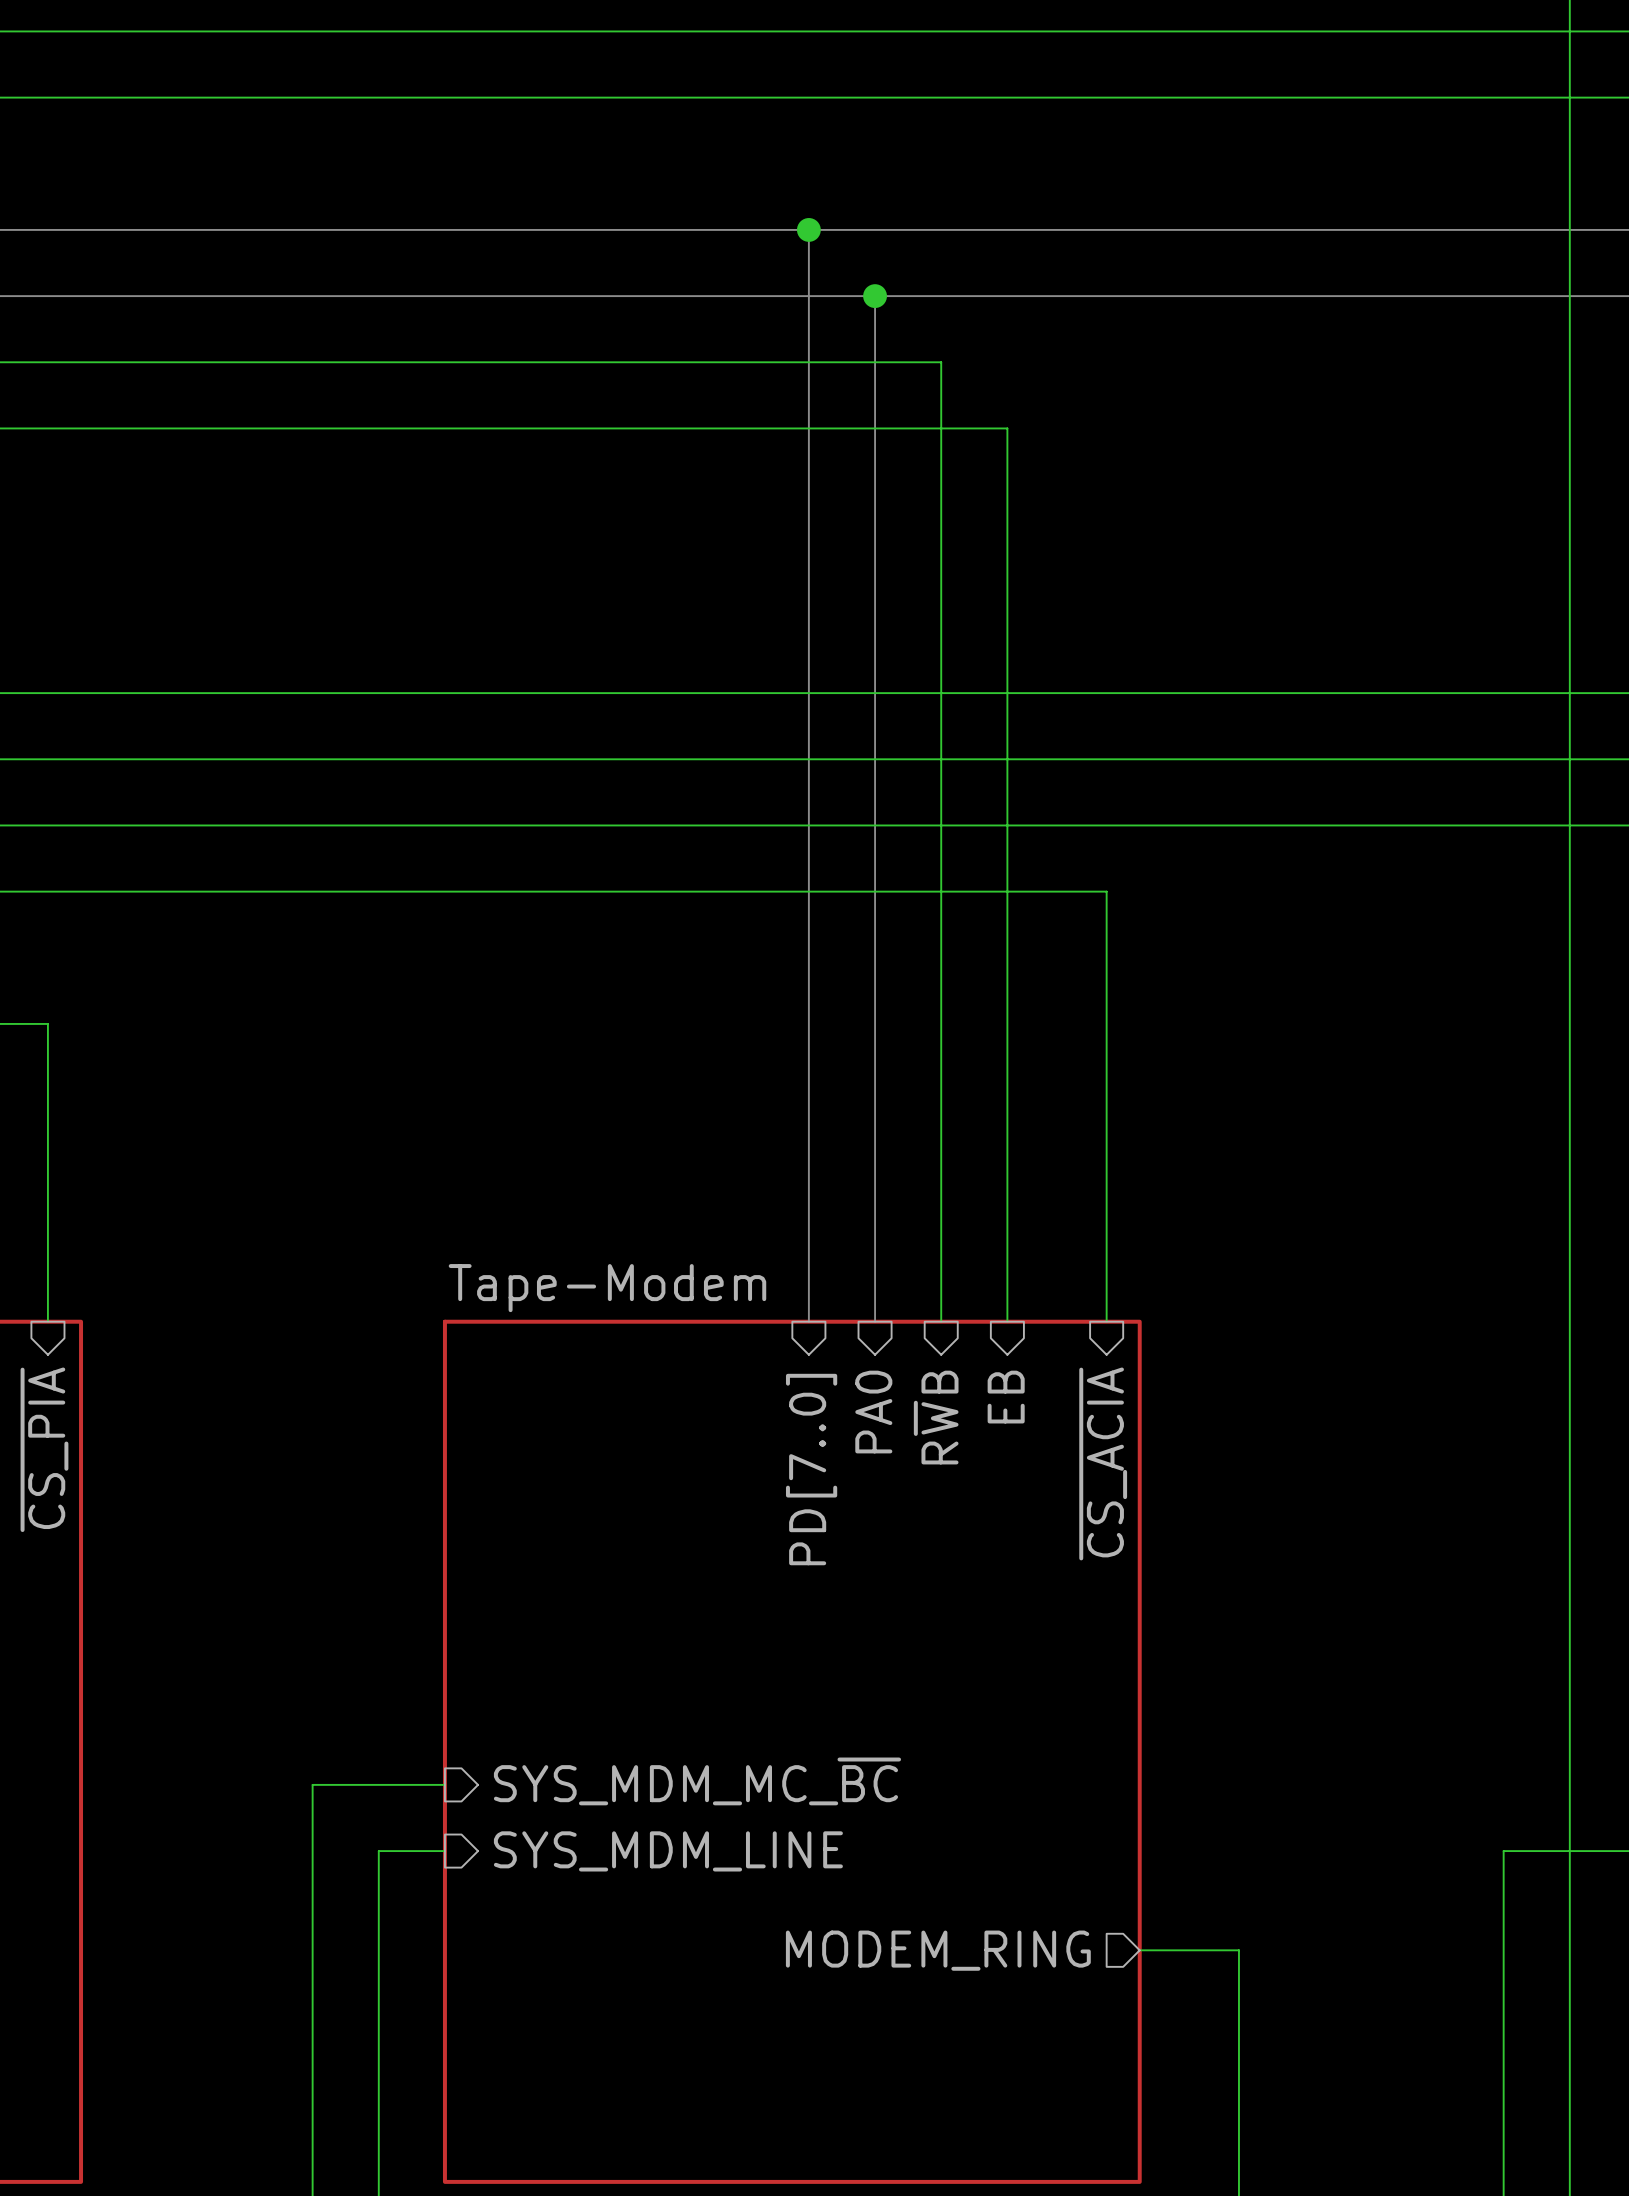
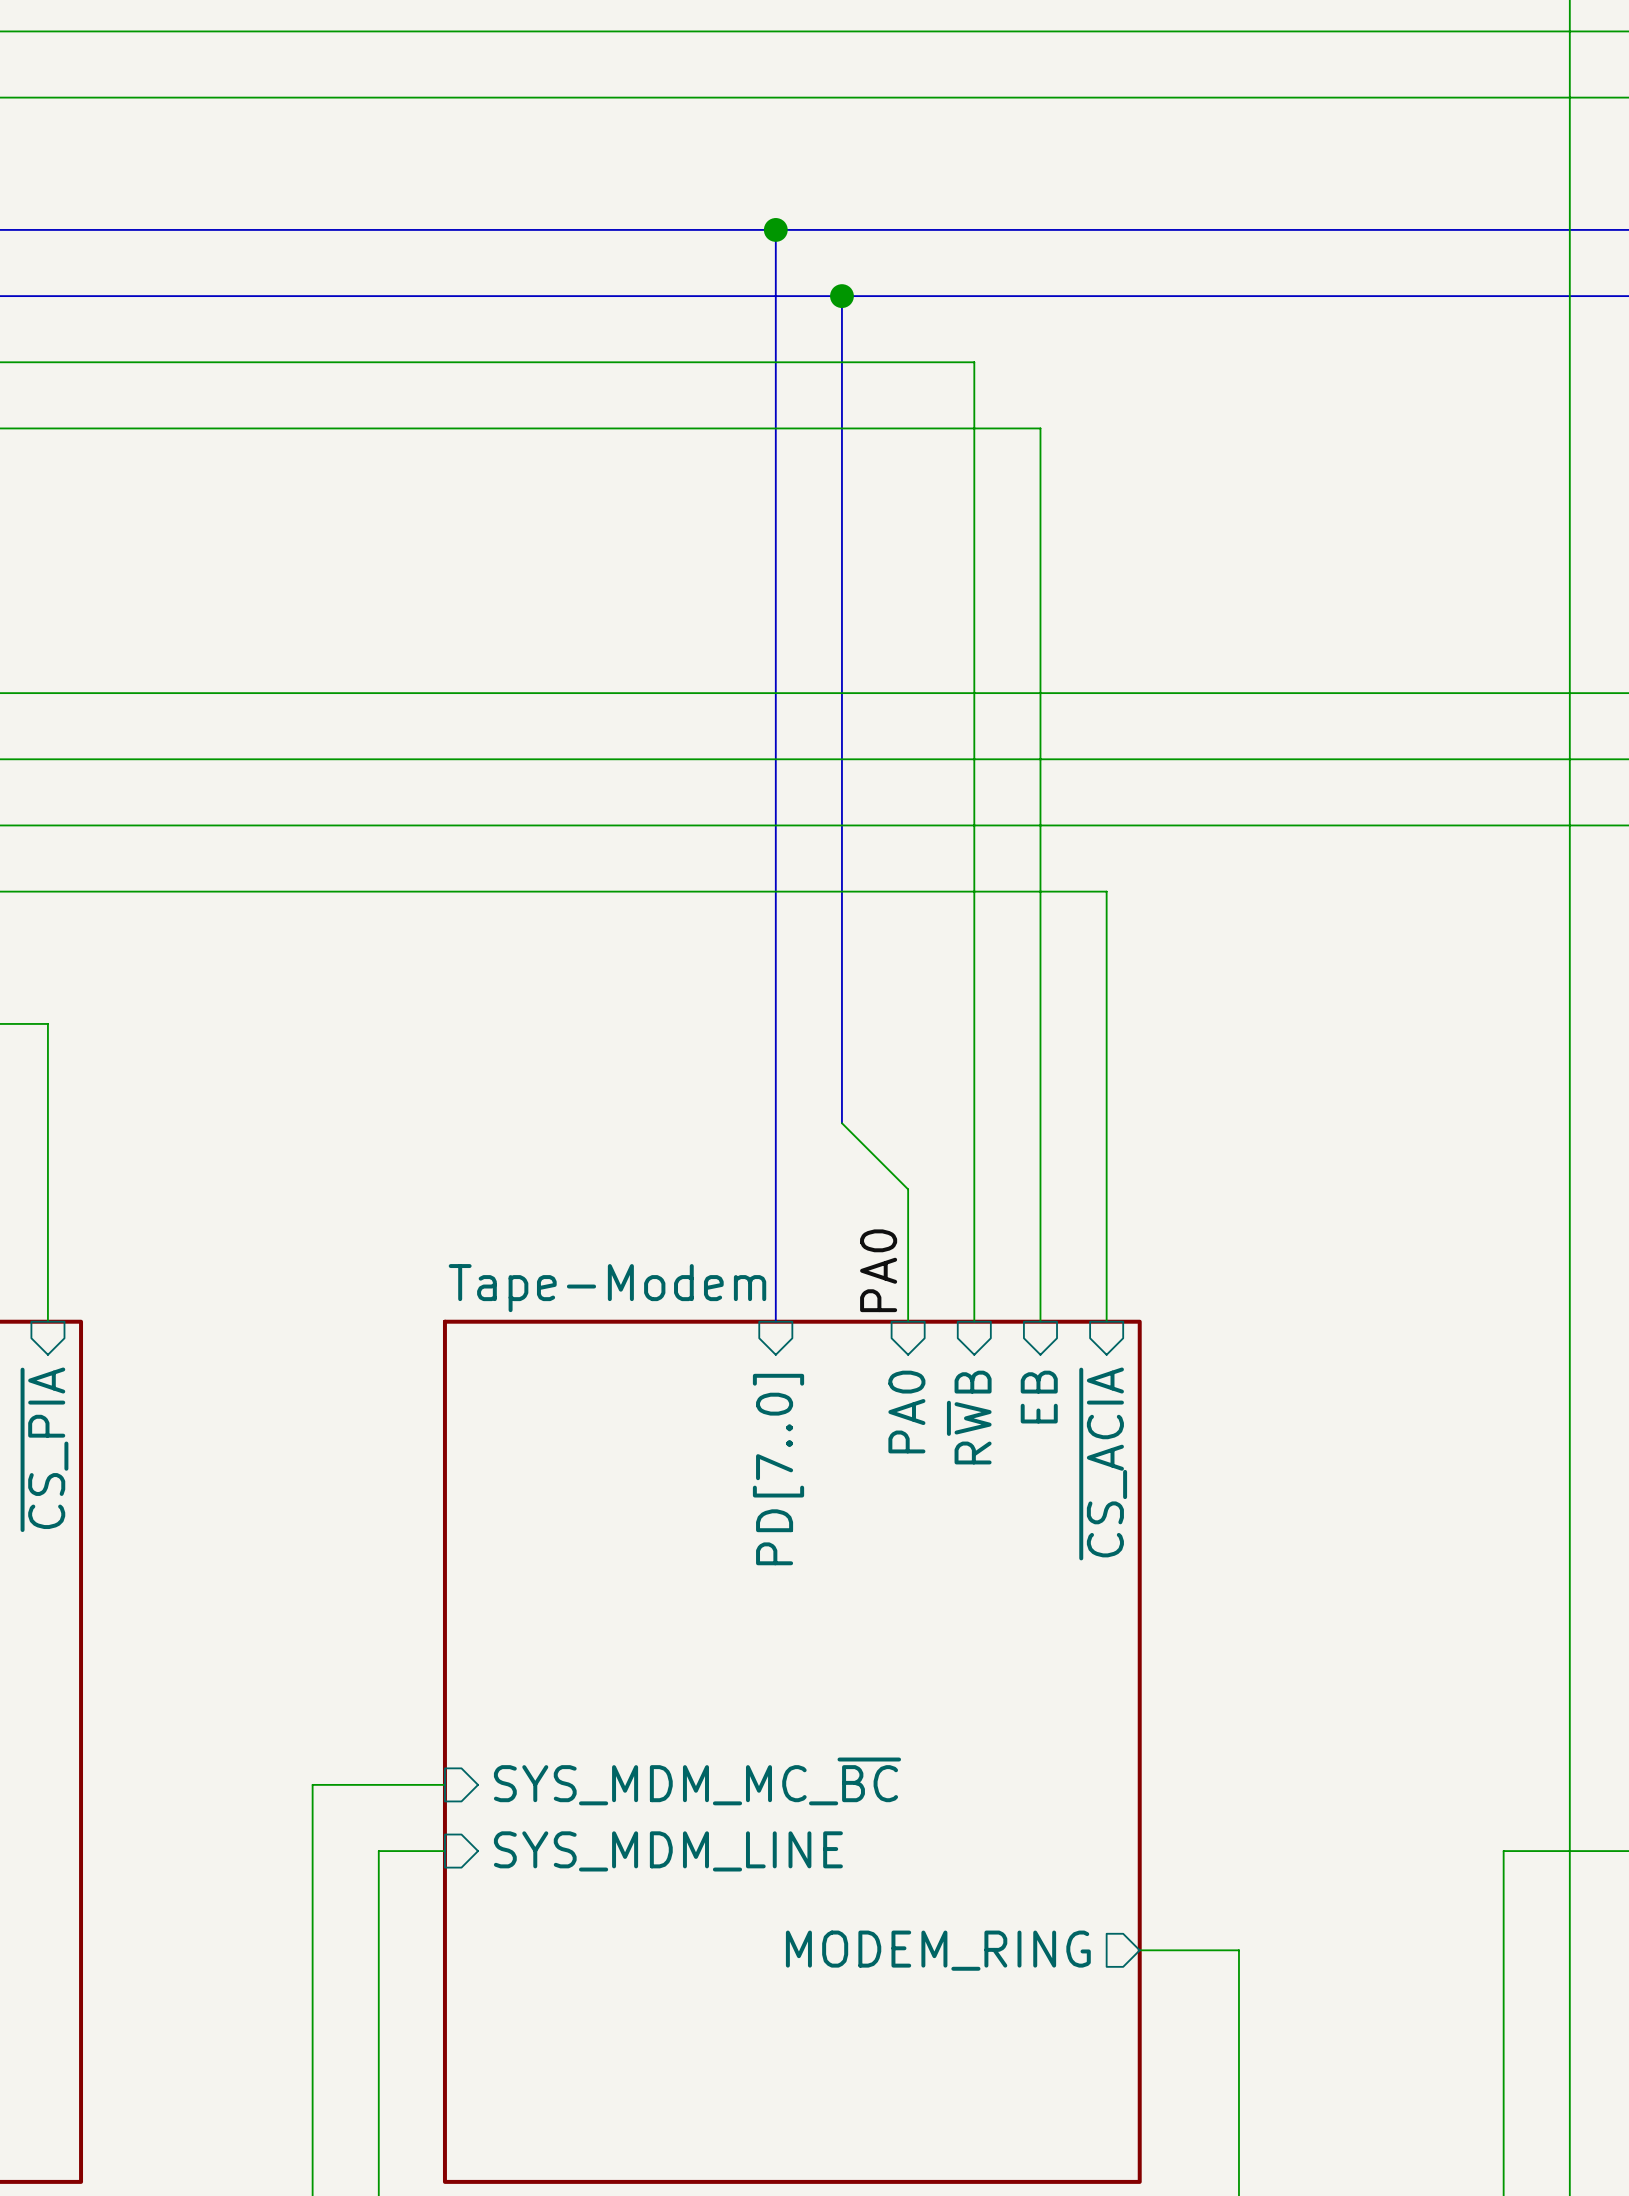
bus: (808, 229) (808, 1321) -> (775, 229) (775, 1321)
junction position: (808, 229) -> (775, 229)
bus: none -> (841, 296) (841, 1123)
bus: (875, 296) (875, 1321) -> none
junction position: (875, 296) -> (841, 296)
wire: (941, 362) (941, 1321) -> (941, 362) (974, 362) (974, 1321)
wire: (1007, 428) (1007, 1321) -> (1007, 428) (1040, 428) (1040, 1321)
wire: none -> (841, 1123) (908, 1189) (908, 1321)
label: none -> PA0 (878, 1270)
sheet pin position: EB (1006, 1397) -> EB (1039, 1397)
sheet pin position: PA0 (873, 1412) -> PA0 (906, 1412)
sheet pin position: R~{W}B (936, 1417) -> R~{W}B (969, 1417)
sheet pin position: PD[7..0] (811, 1469) -> PD[7..0] (778, 1469)

